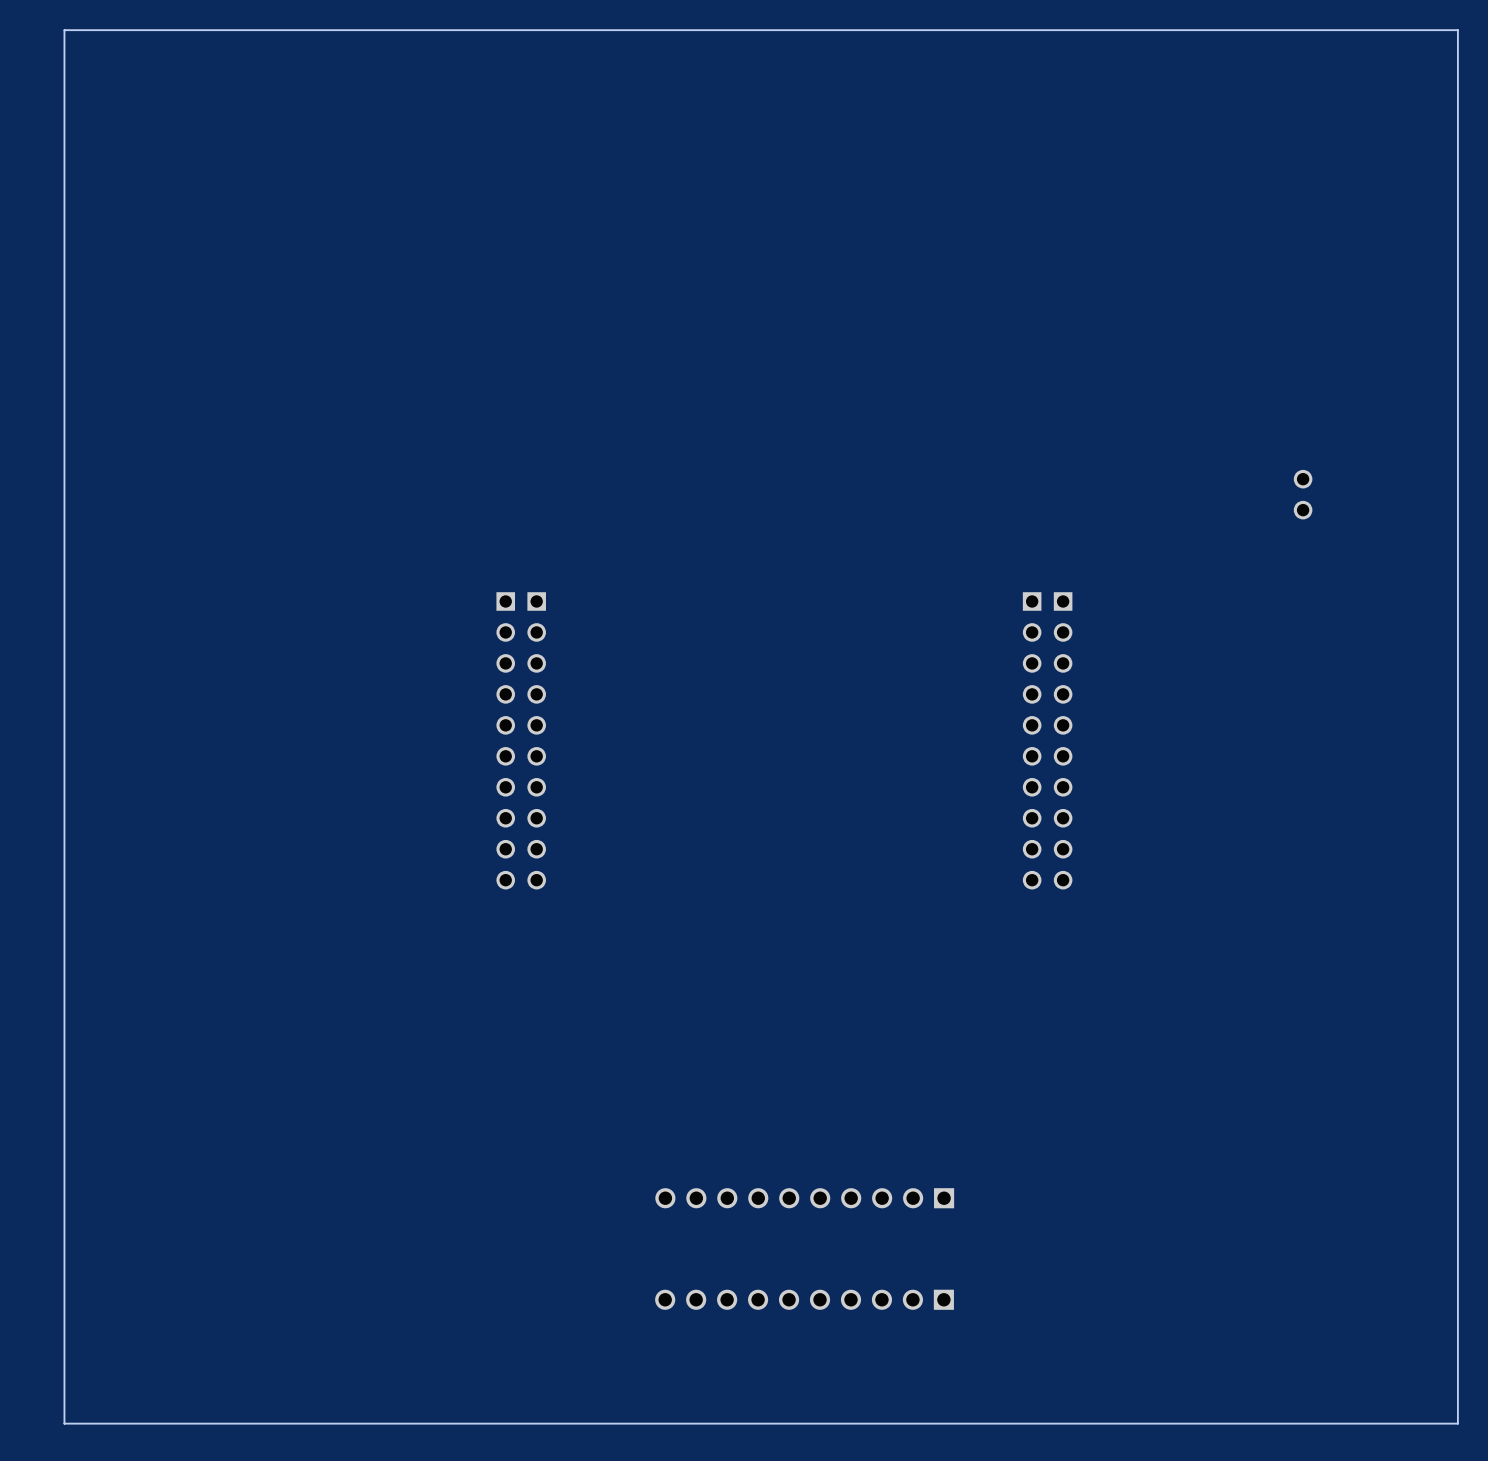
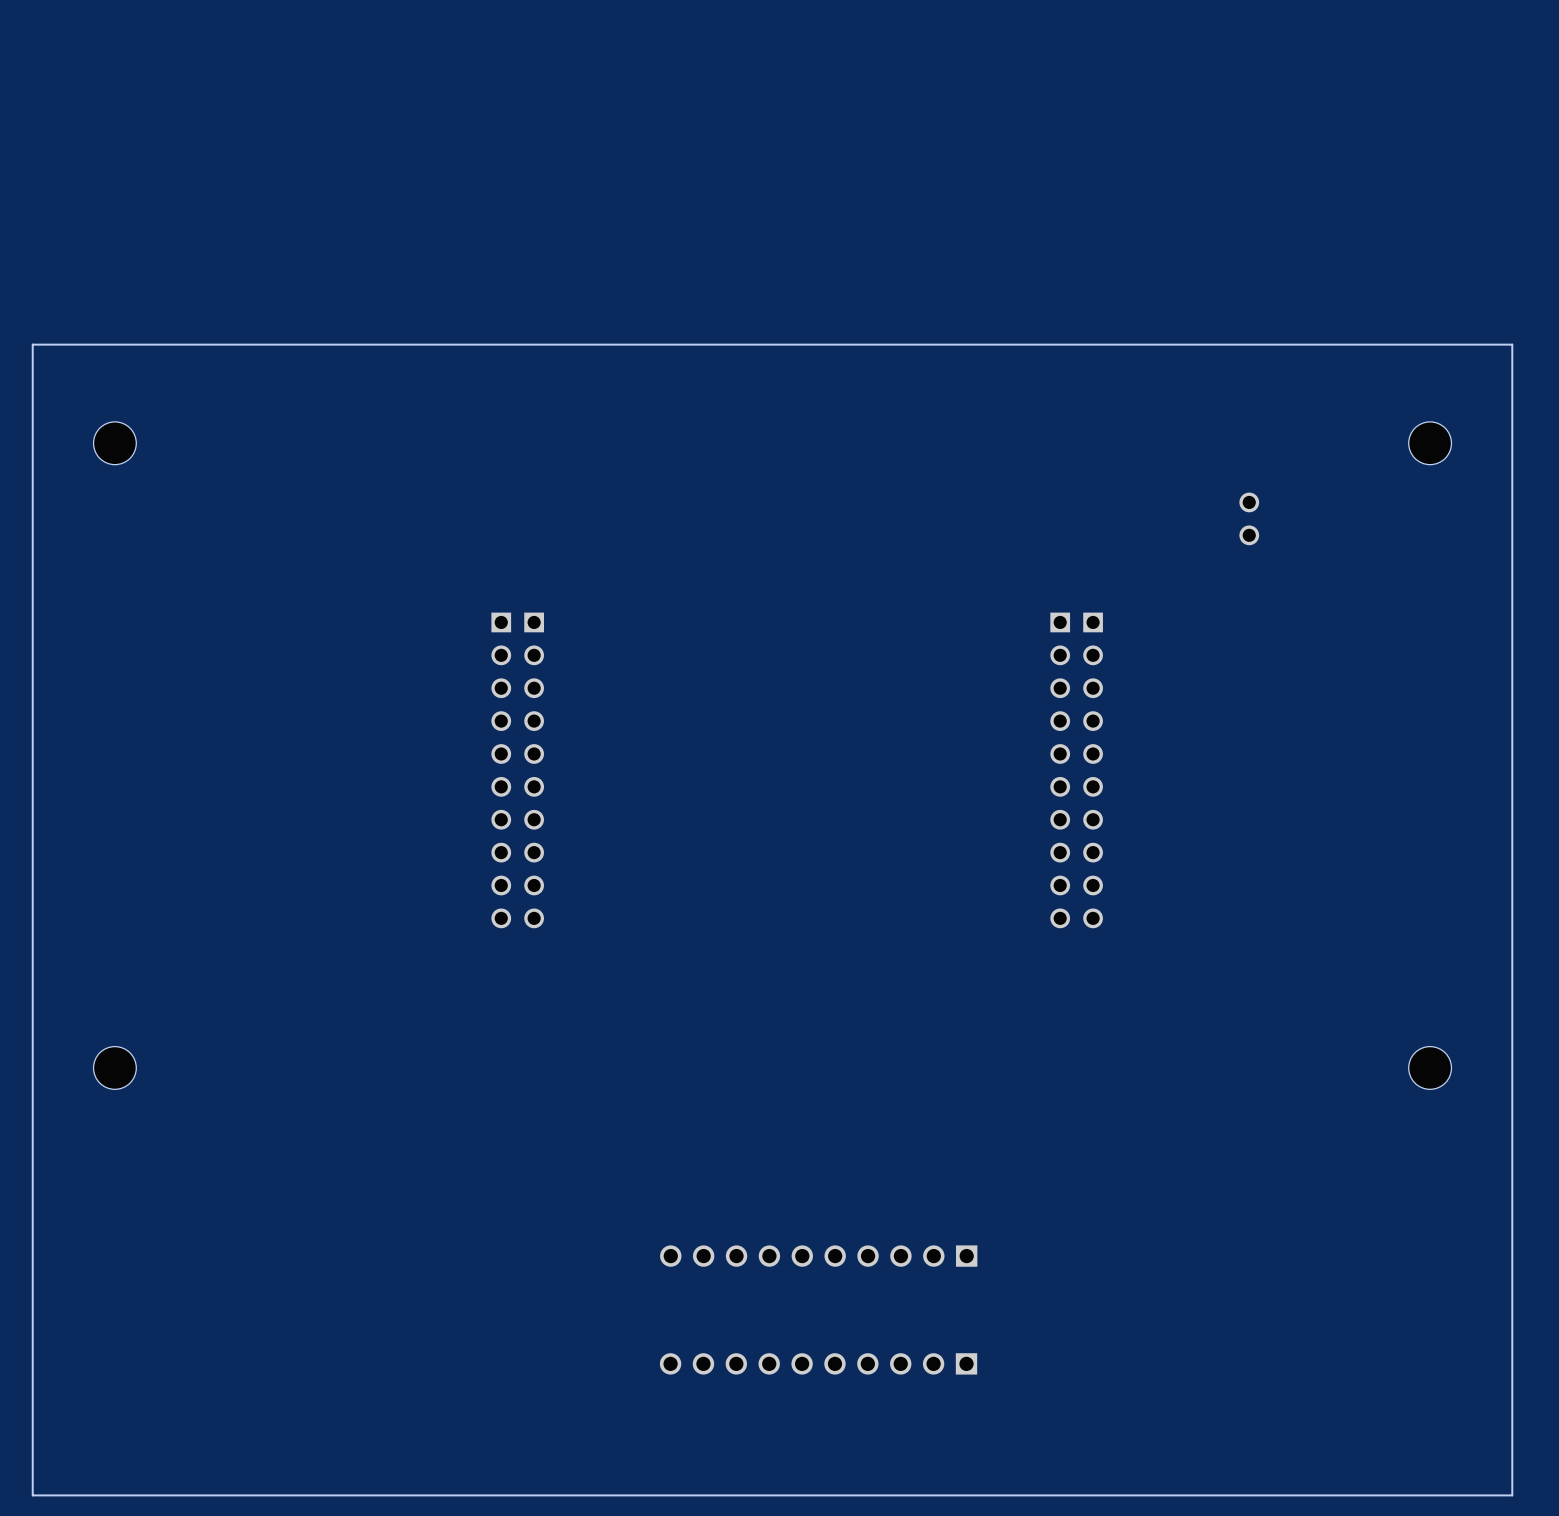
board edge: (1457, 339) (1457, 30) (64, 30) (64, 339) -> (1512, 344) (32, 344)
hole: none -> (114, 443)
hole: none -> (1430, 443)
part position: (1303, 494) -> (1249, 518)
hole: none -> (114, 1067)
hole: none -> (1430, 1067)

